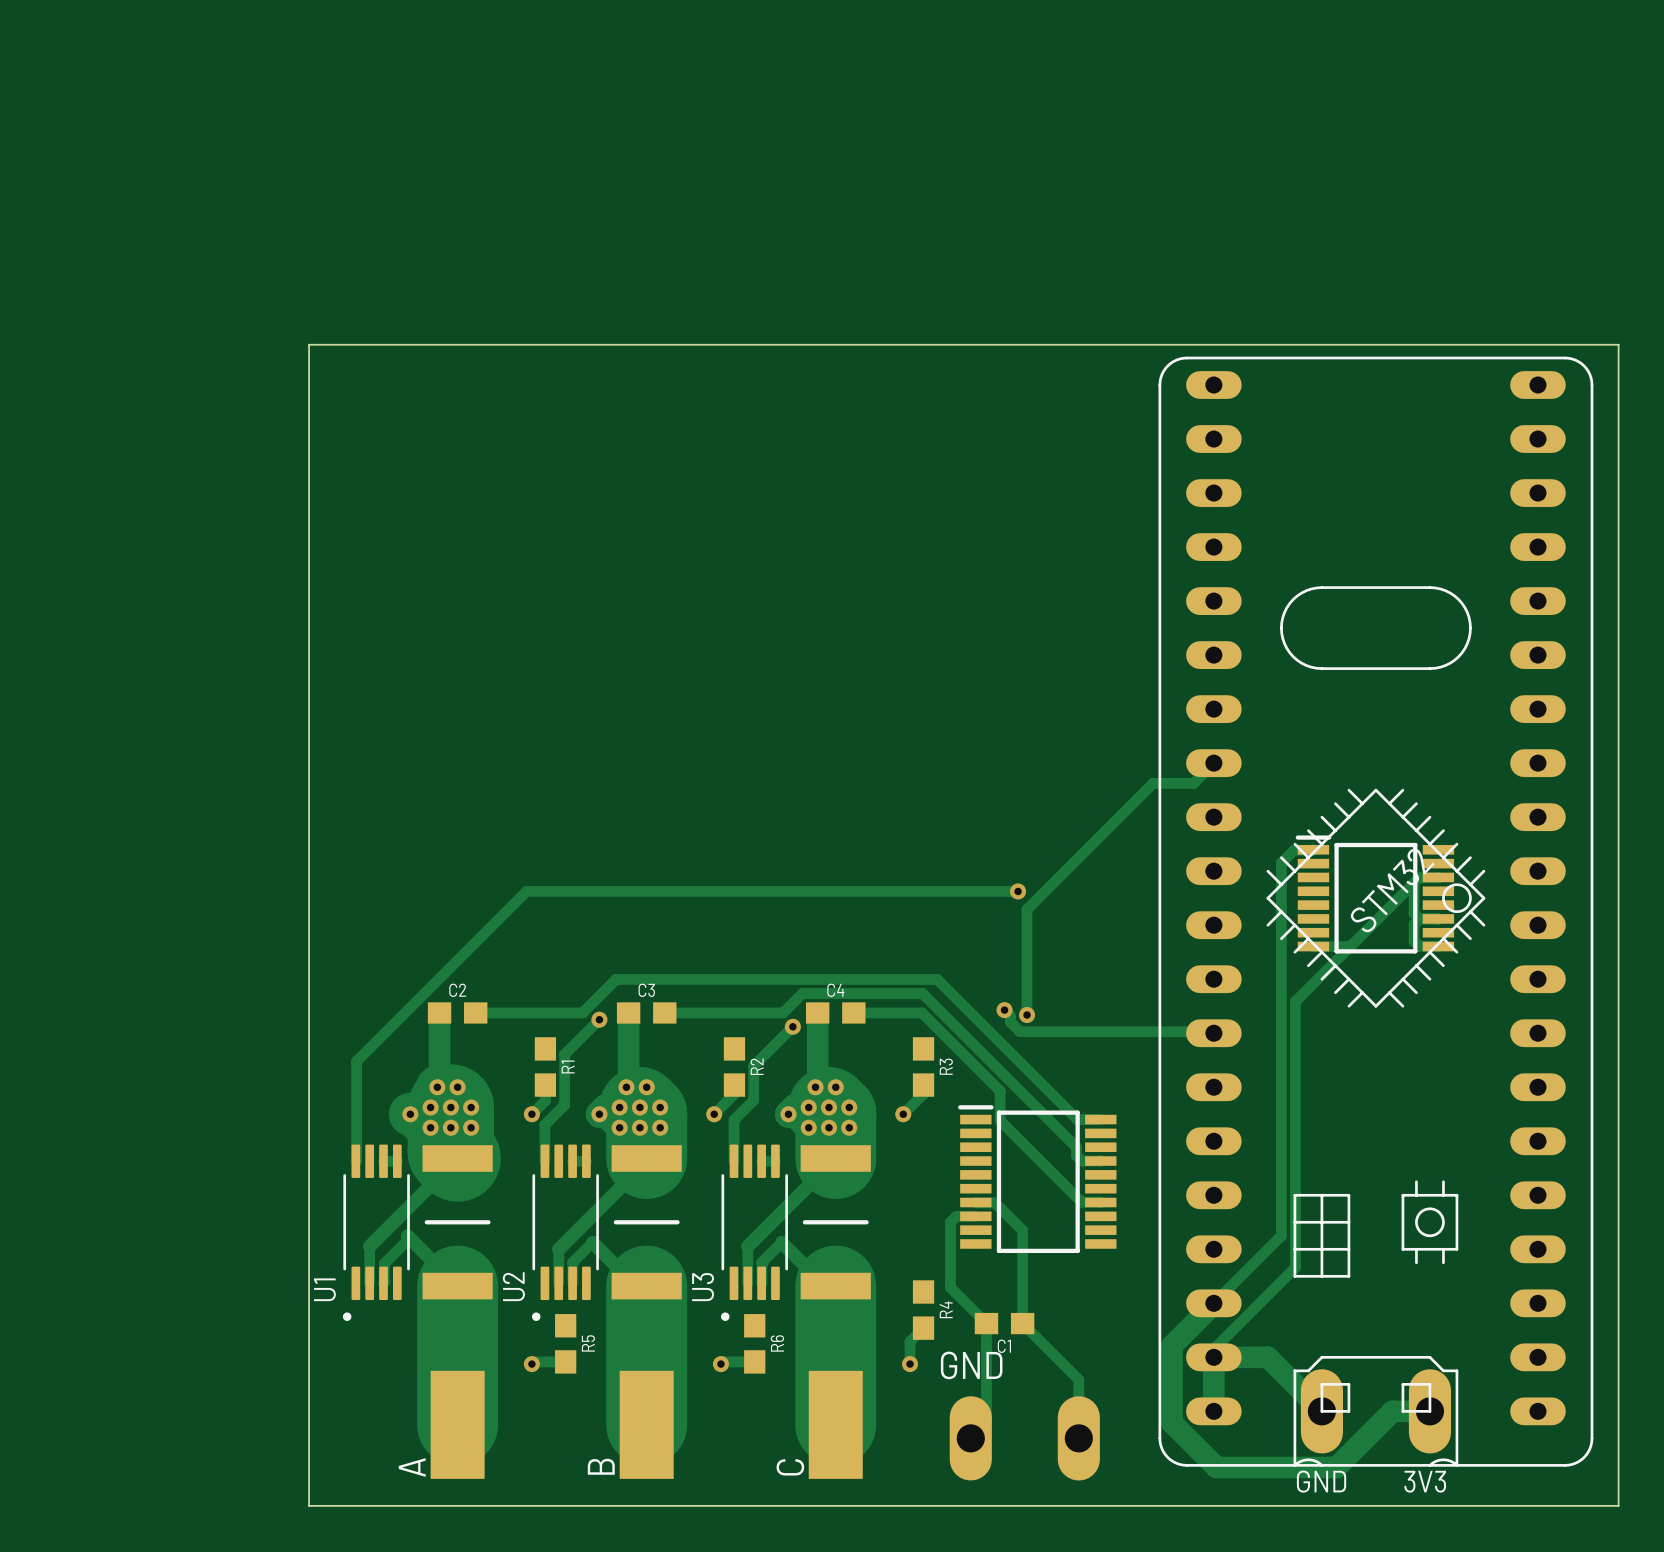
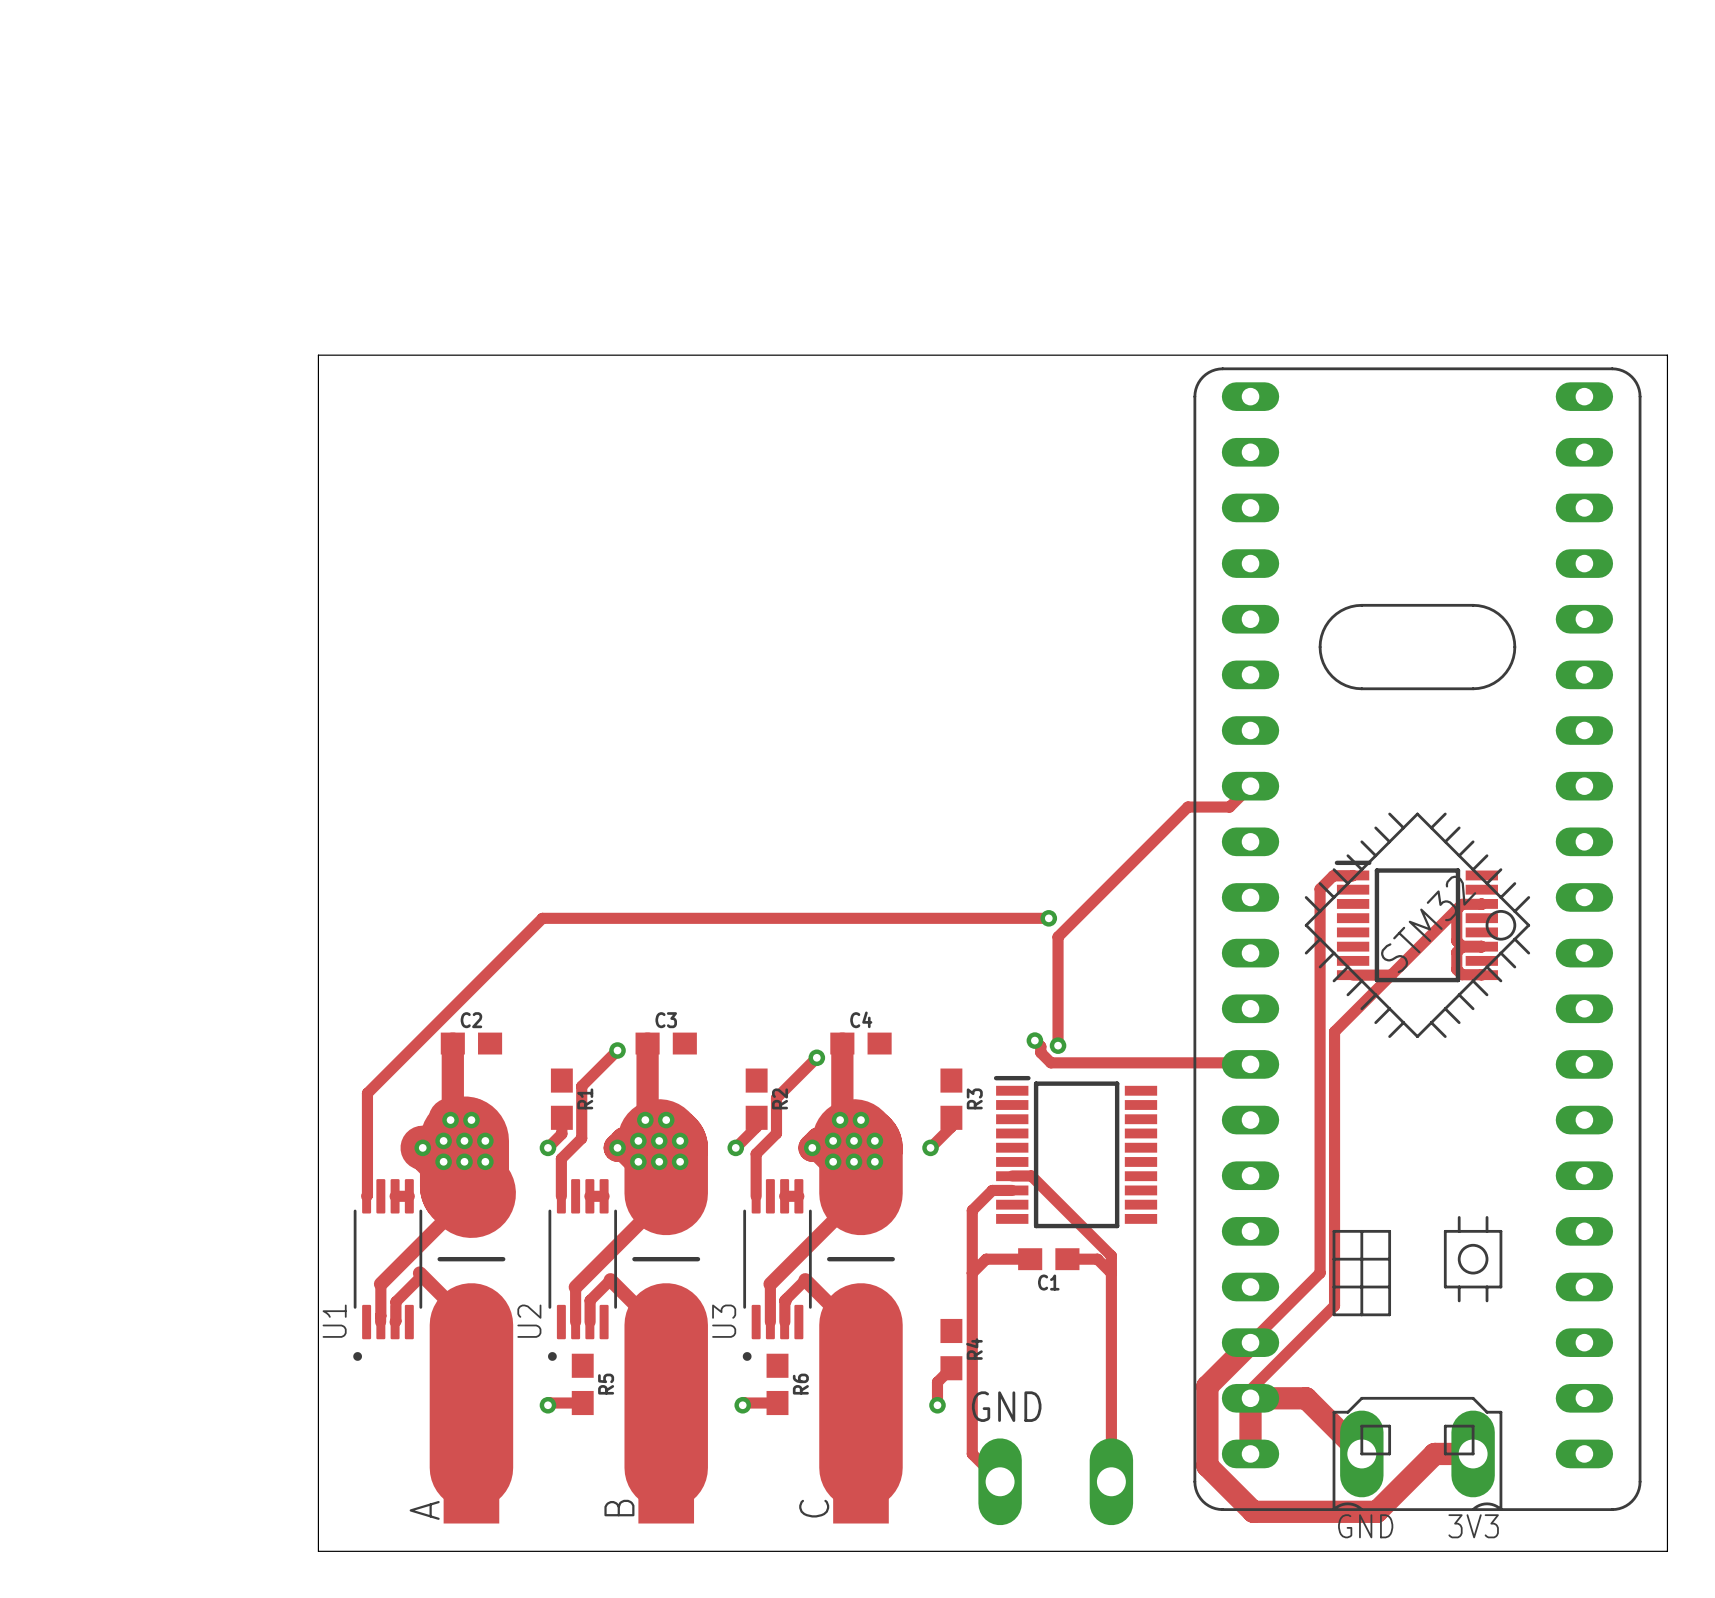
track: (475, 1012) (582, 1012) (616, 979) (937, 979) (1077, 1119) (1100, 1119) -> none
track: (664, 1012) (783, 1012) (802, 993) (922, 993) (1076, 1147) (1076, 1155) (1081, 1161) (1101, 1160) -> none
track: (853, 1012) (922, 1012) (1000, 1090) (1000, 1120) (1081, 1202) (1100, 1202) -> none
part position: (1037, 1179) -> (1075, 1152)
track: (975, 1202) (995, 1202) (1022, 1230) (1022, 1323) (1078, 1379) -> (1012, 1175) (1031, 1175) (1111, 1255) (1111, 1421)
track: (975, 1216) (956, 1216) (950, 1222) (950, 1287) (986, 1323) (986, 1422) (970, 1438) -> (1012, 1190) (992, 1190) (972, 1210) (972, 1453) (1000, 1481)
track: none -> (1030, 1259) (986, 1259) (972, 1273)
track: none -> (1067, 1259) (1097, 1259) (1111, 1273)
C1 position: (1004, 1323) -> (1048, 1259)

